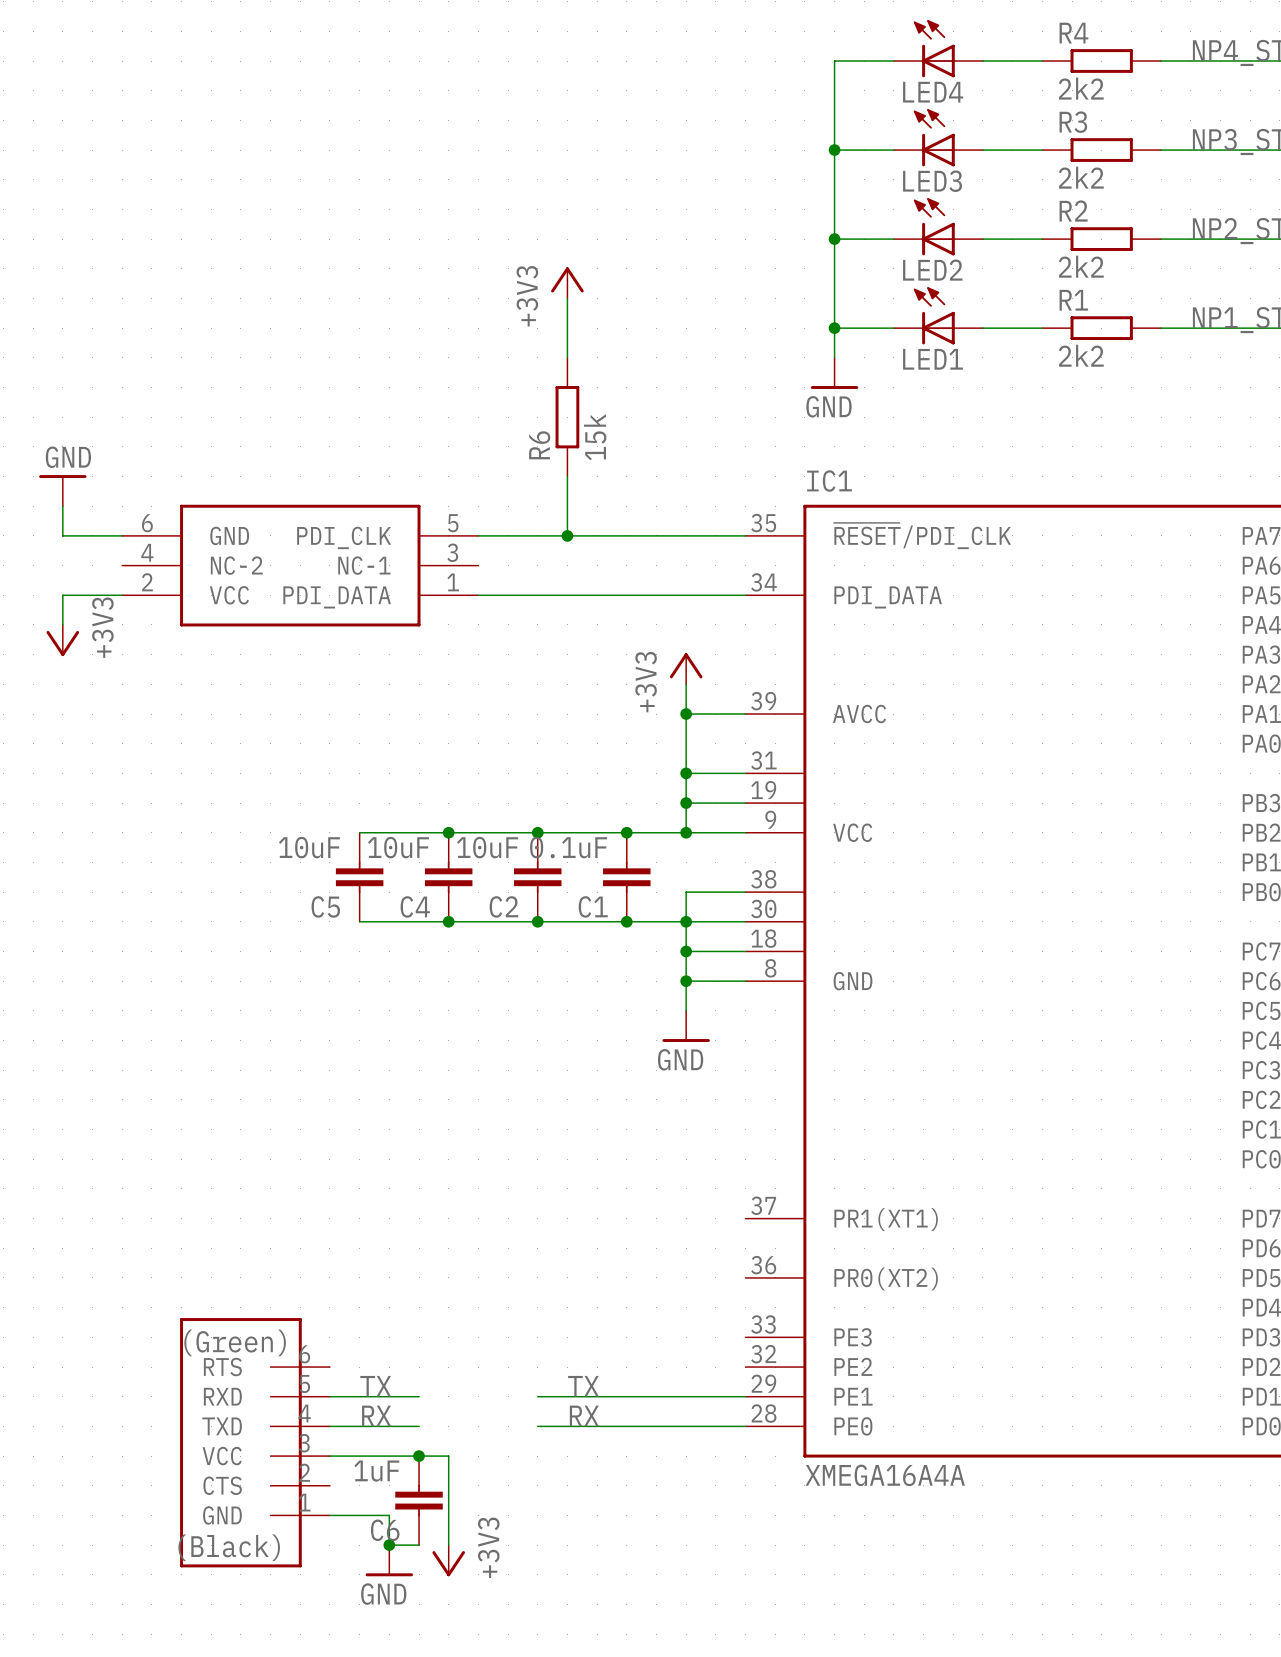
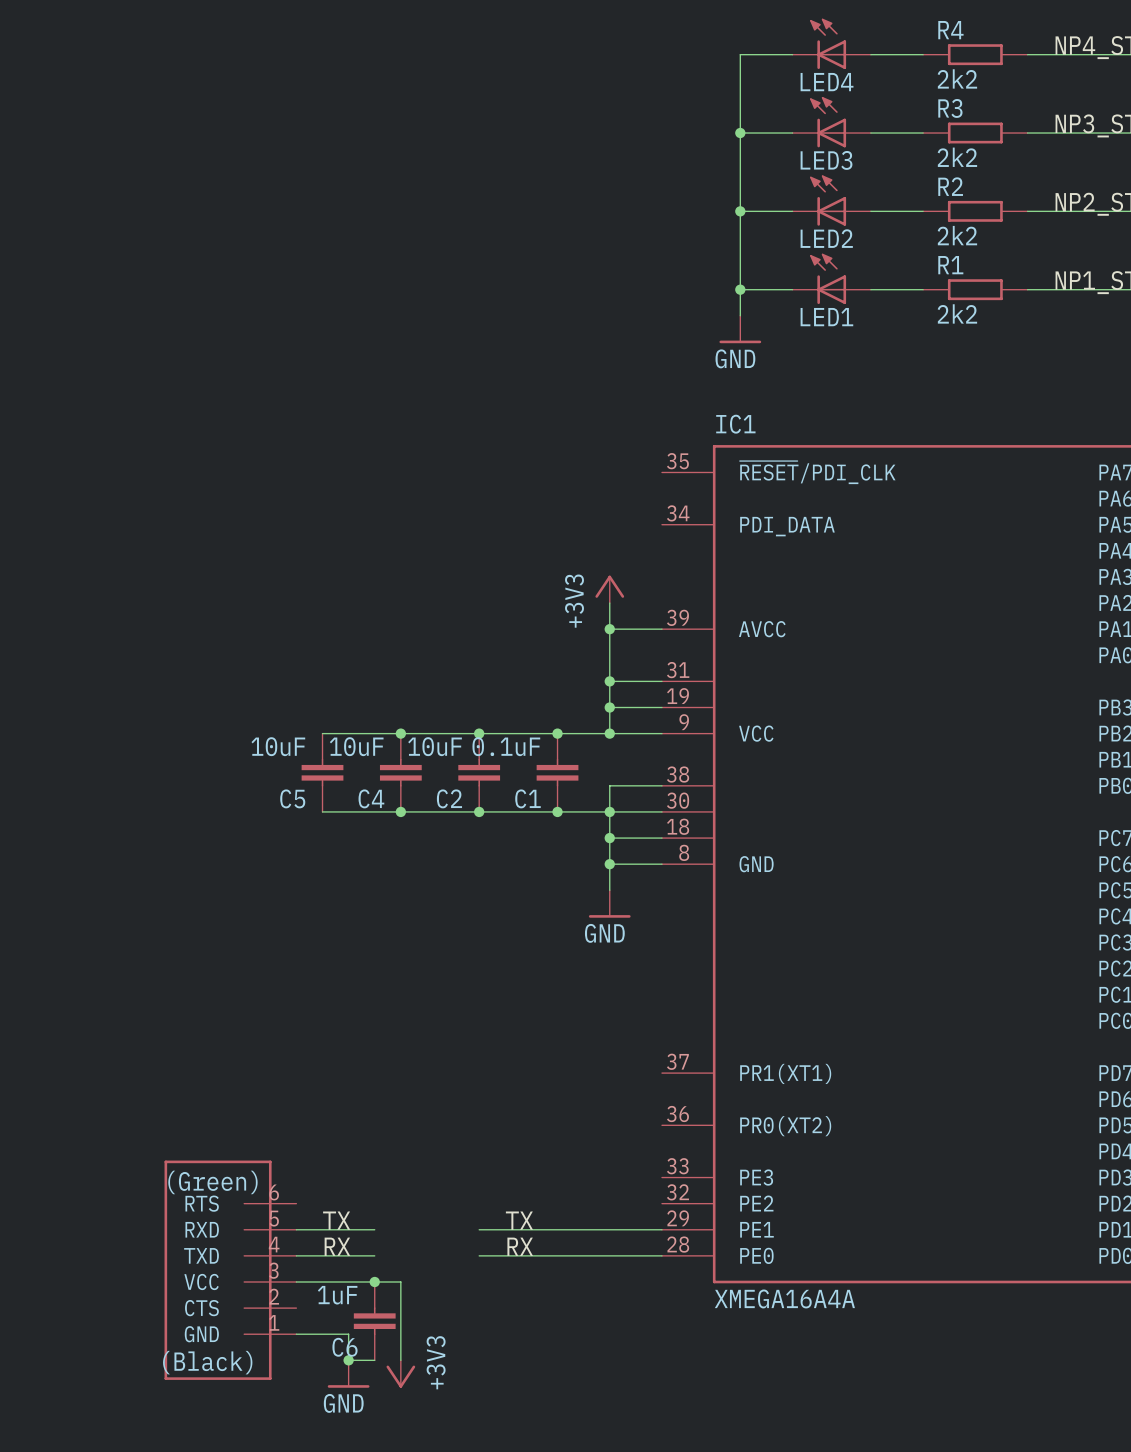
power symbol: +3V3 (567, 282) -> none
wire: (567, 298) (567, 357) -> none
R6: 15k (567, 417) -> none
wire: (567, 476) (567, 535) -> none
power symbol: GND (62, 490) -> none
wire: (62, 506) (62, 535) (122, 535) -> none
wire: (478, 535) (745, 535) -> none
junction: (567, 535) -> none
part: (300, 565) -> none
wire: (122, 595) (62, 595) (62, 624) -> none
wire: (478, 595) (745, 595) -> none
power symbol: +3V3 (62, 640) -> none

